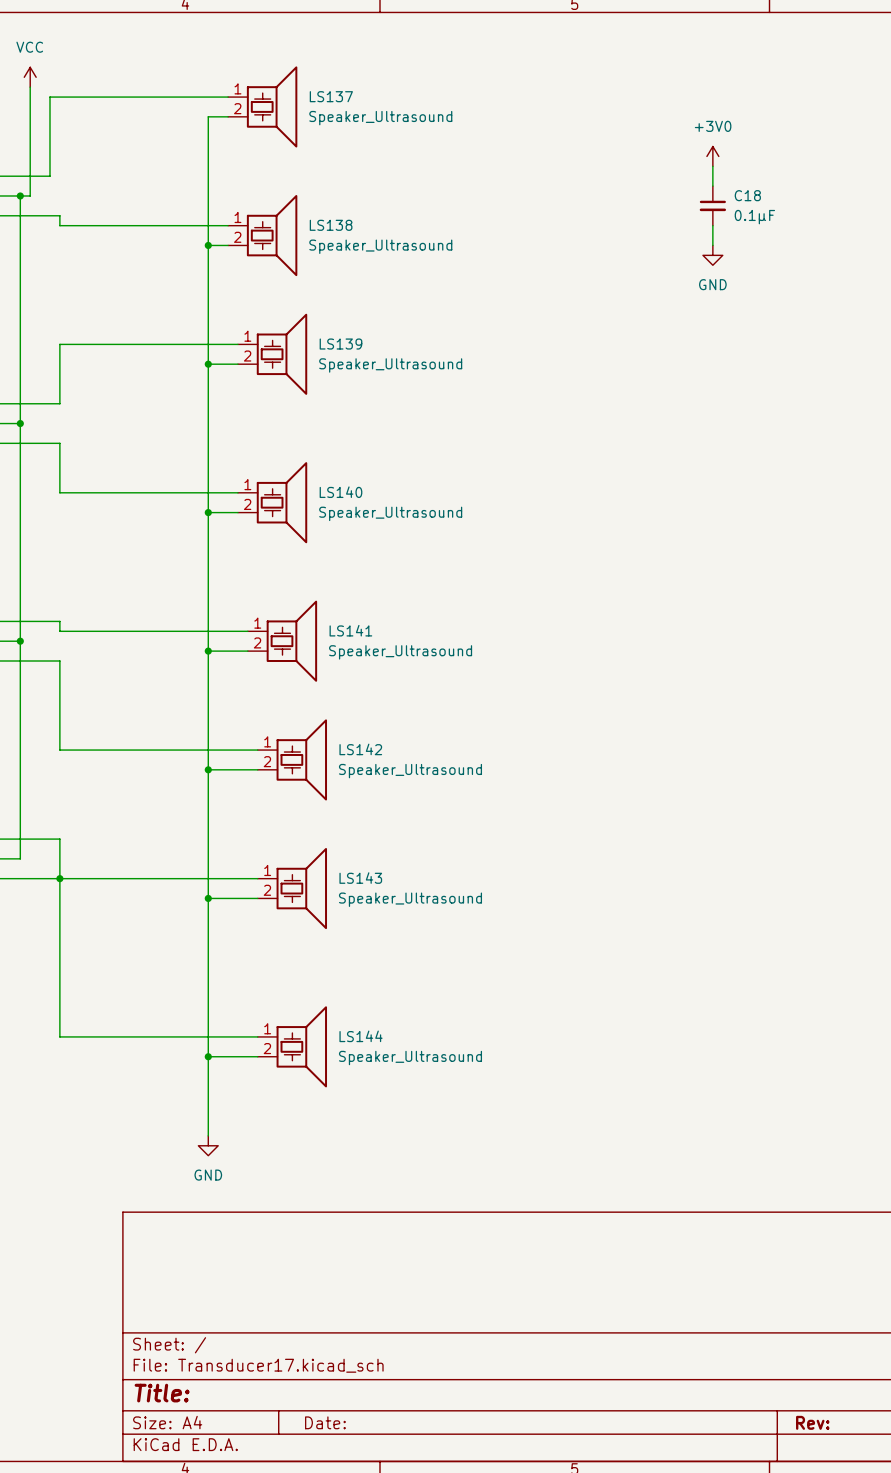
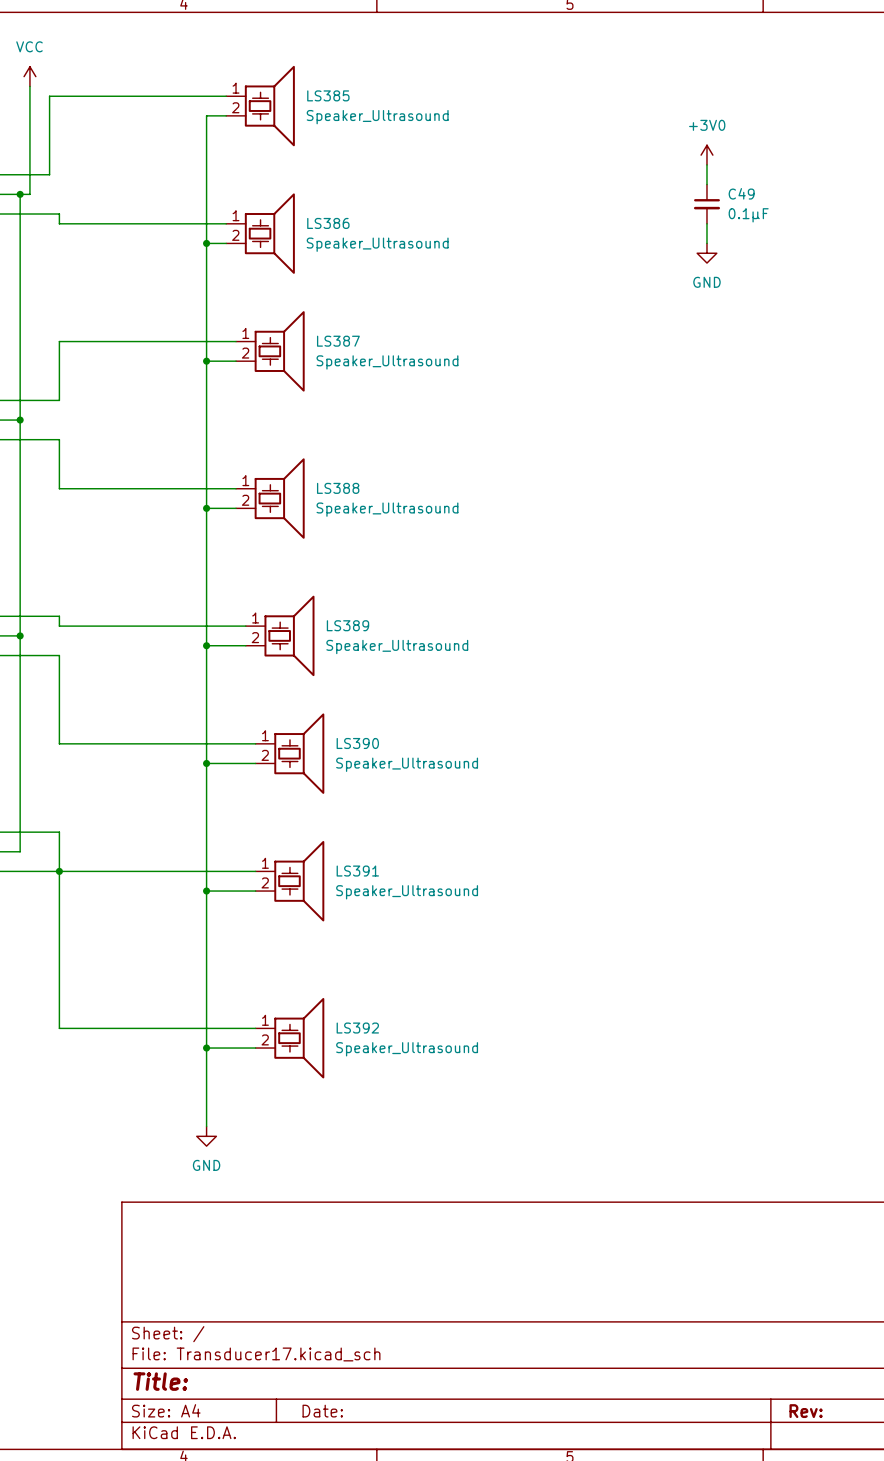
LS137 name: LS137 (331, 96) -> LS385 (328, 95)
C18 name: C18 (747, 195) -> C49 (741, 193)
LS138 name: LS138 (331, 225) -> LS386 (328, 223)
LS139 name: LS139 (340, 344) -> LS387 (338, 341)
LS140 name: LS140 (340, 492) -> LS388 (338, 488)
LS141 name: LS141 (350, 630) -> LS389 (347, 625)
LS142 name: LS142 (360, 749) -> LS390 (357, 743)
LS143 name: LS143 (360, 878) -> LS391 (357, 871)
LS144 name: LS144 (361, 1036) -> LS392 (357, 1028)

